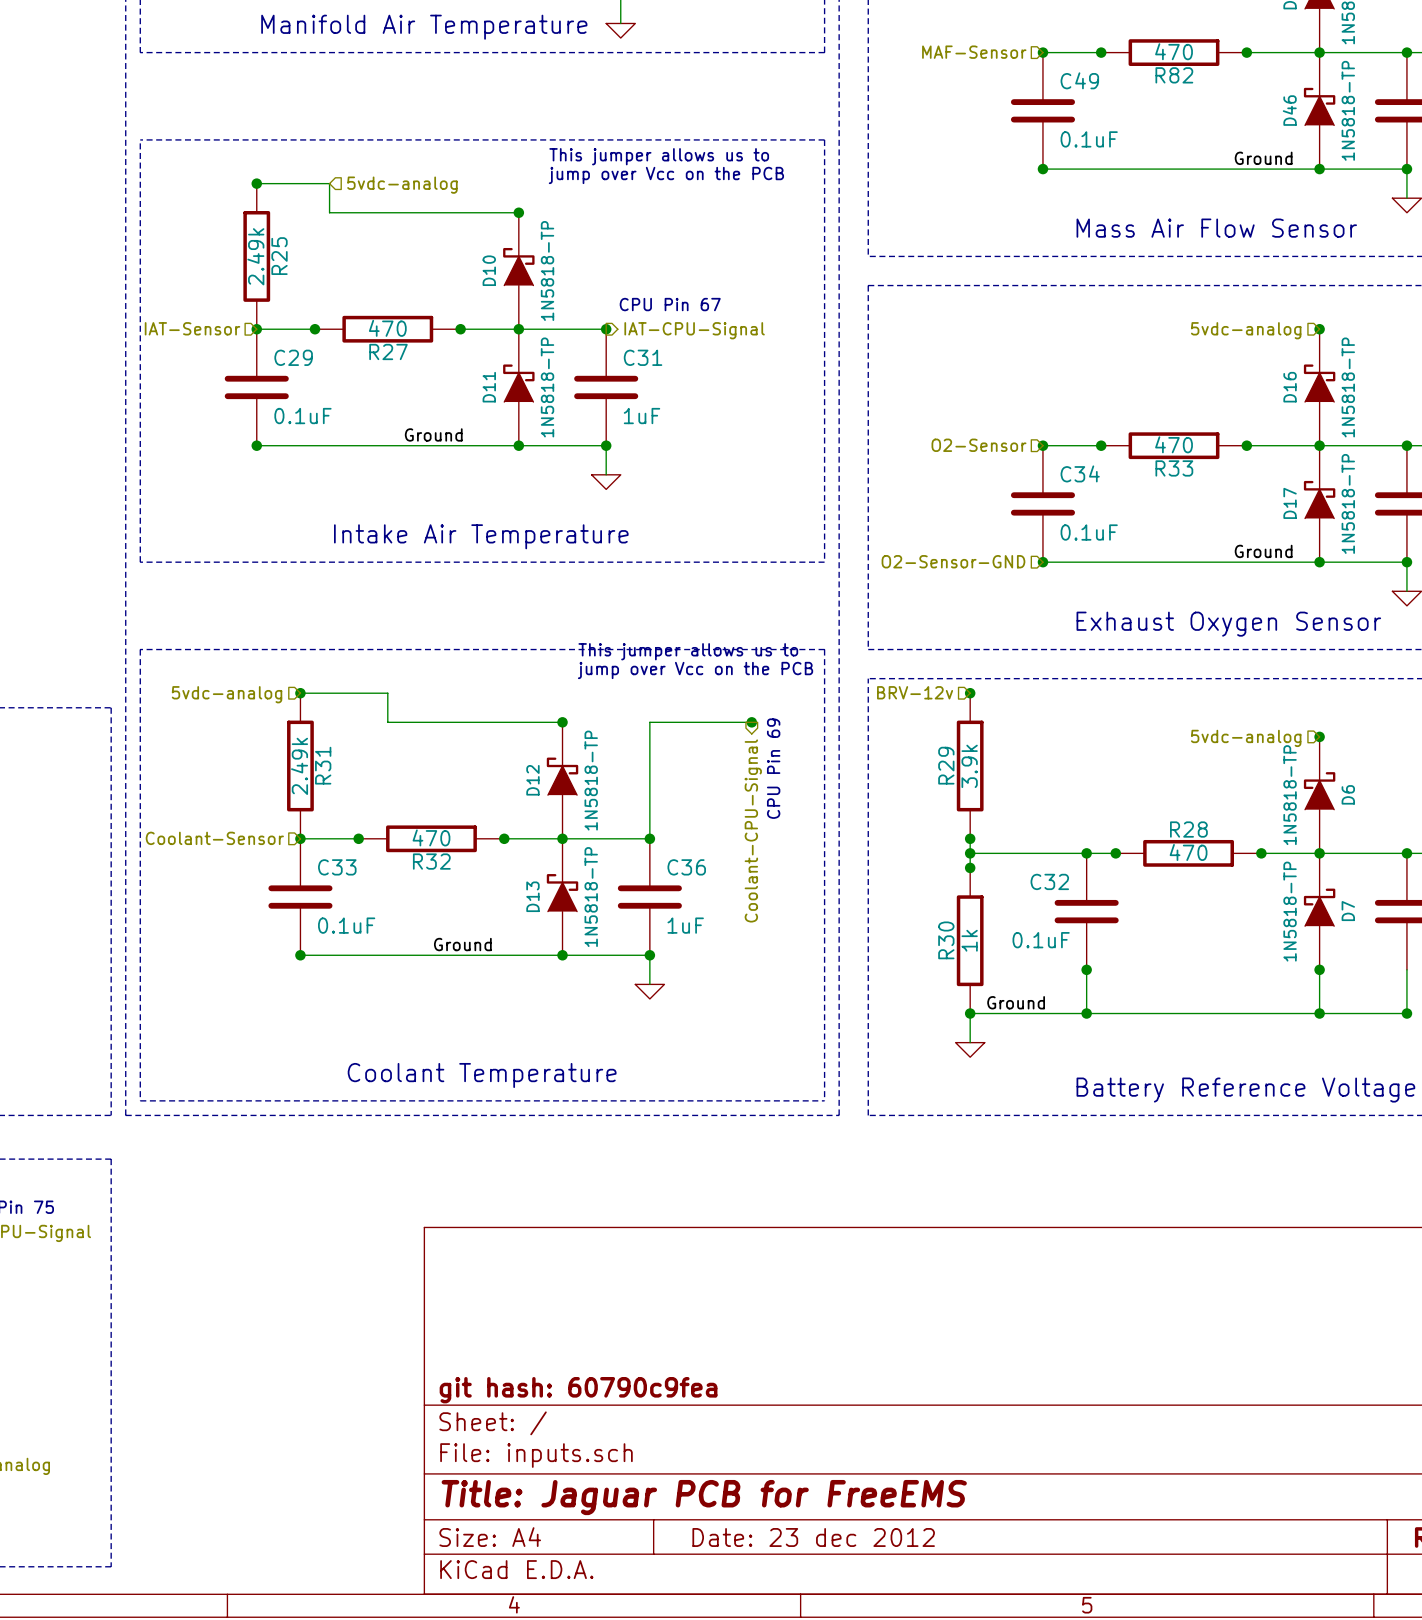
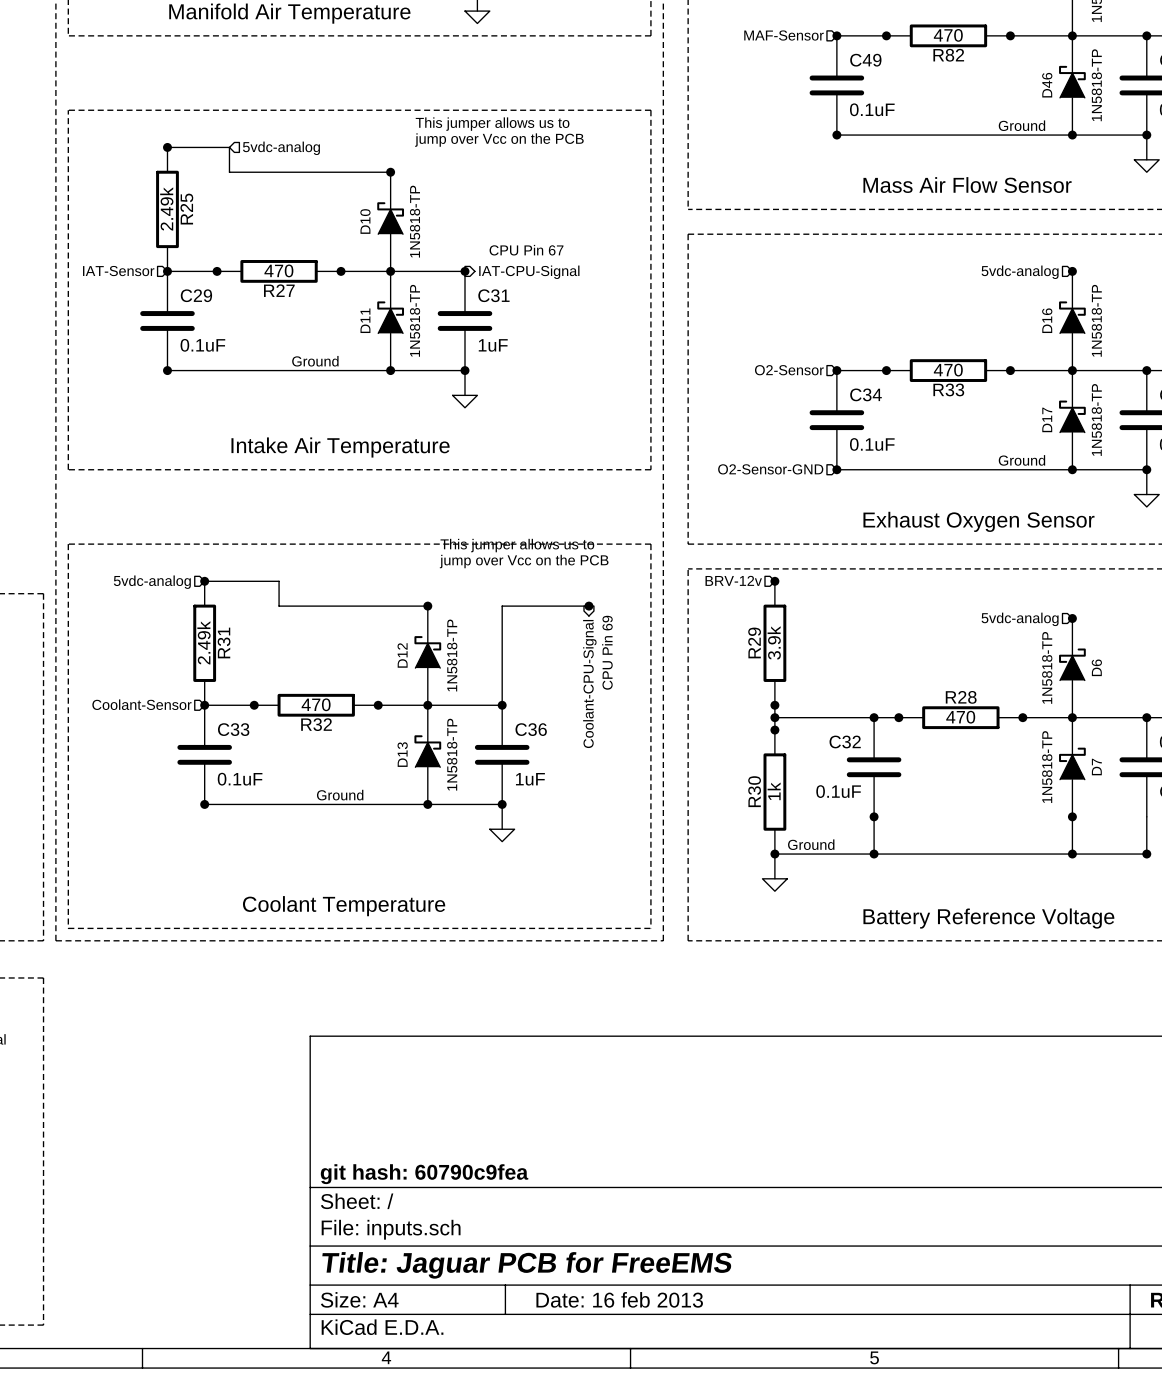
title block: Date: 23 dec 2012 (813, 1537) -> Date: 16 feb 2013 (619, 1299)

